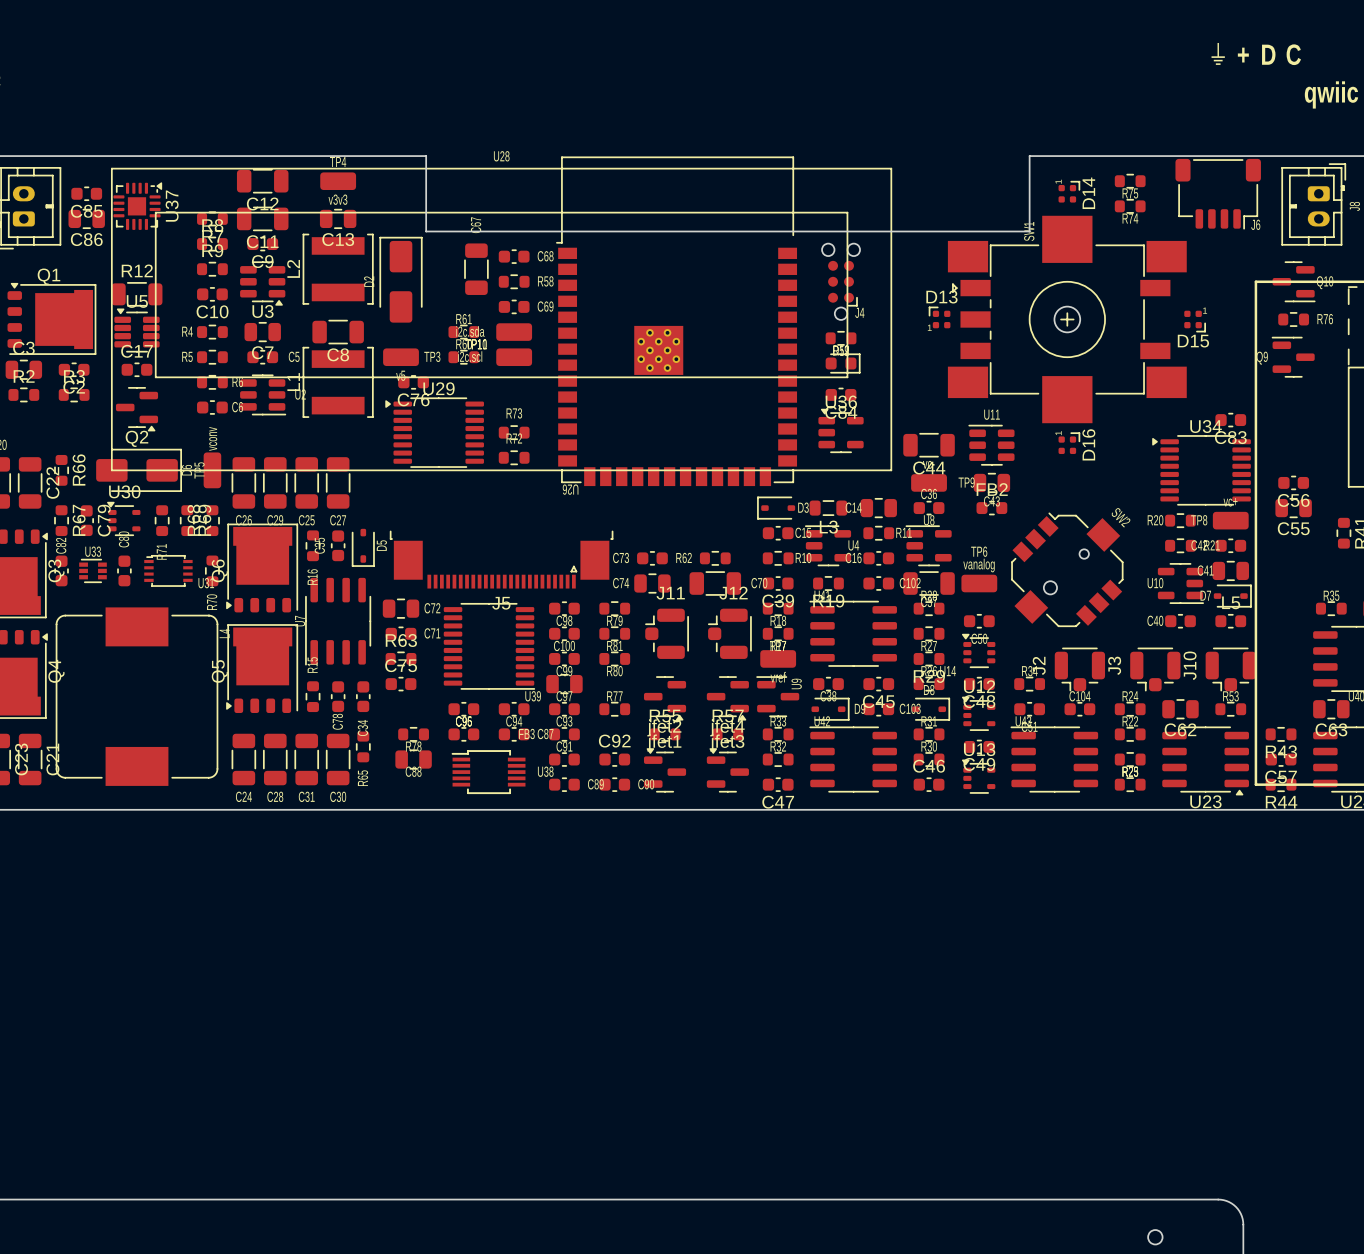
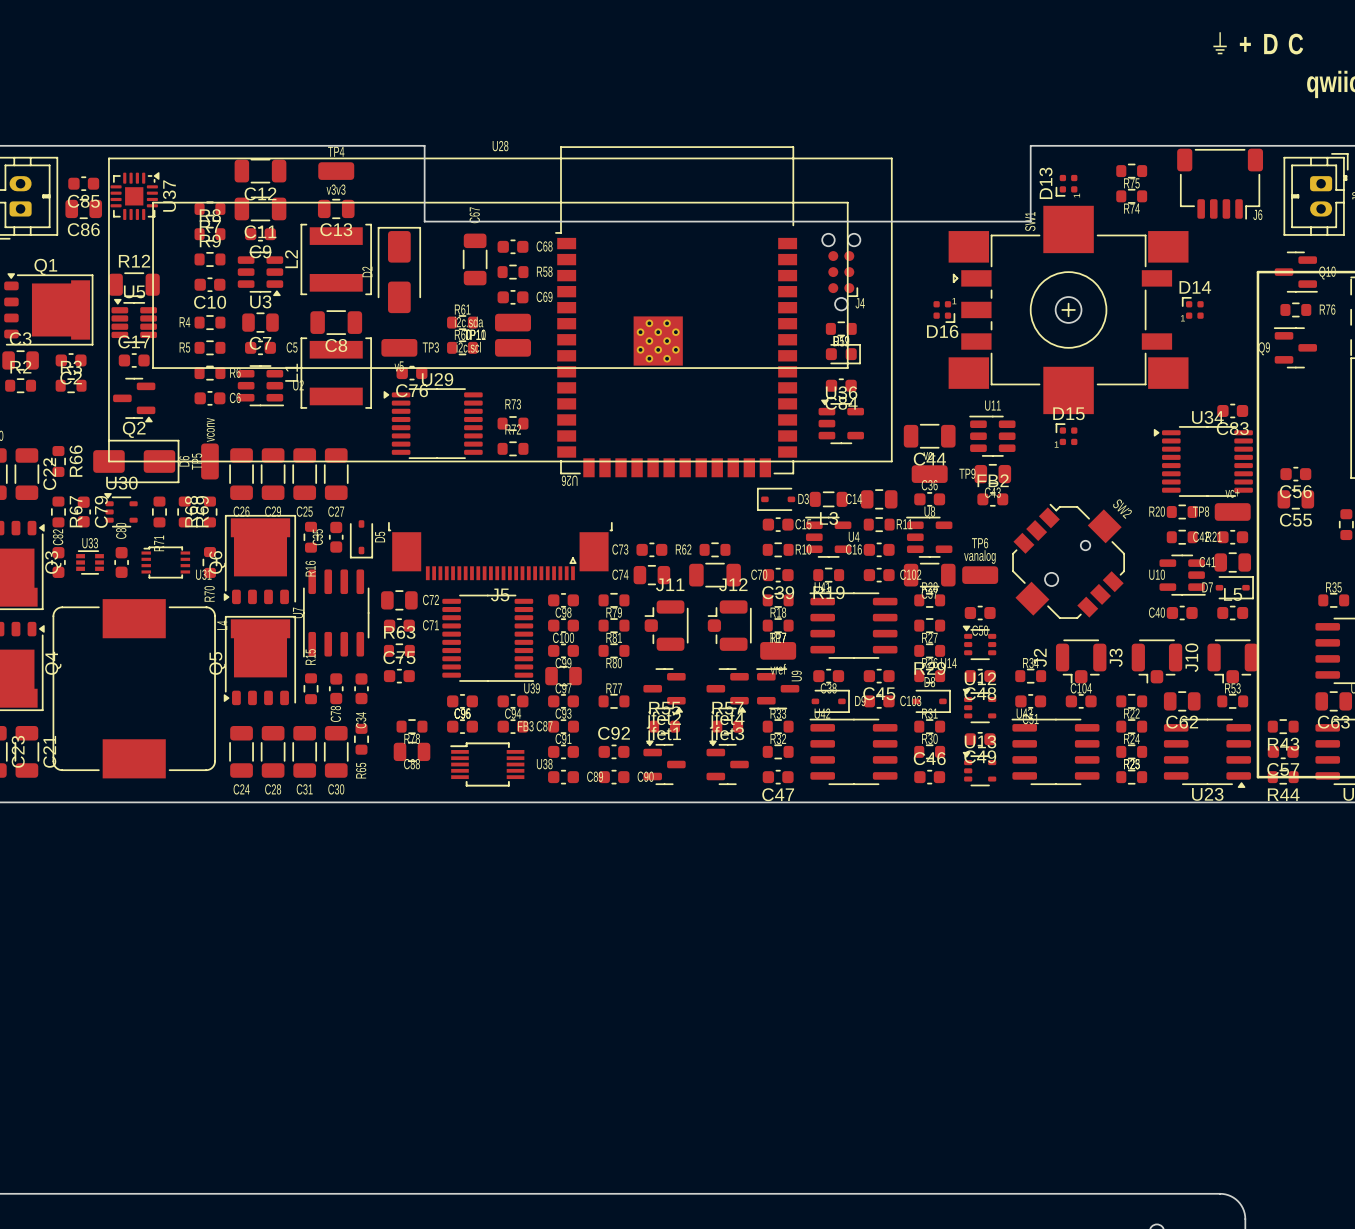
D14 rotation: 0° (1069, 191) -> 90° counterclockwise (1192, 307)
D14 position: (1069, 191) -> (1192, 307)
D13 rotation: 0° (939, 317) -> 90° counterclockwise (1066, 185)
D13 position: (939, 317) -> (1066, 185)
D15 rotation: 0° (1195, 321) -> 180° (1066, 434)
D15 position: (1195, 321) -> (1066, 434)
D16 rotation: 0° (1069, 443) -> 90° clockwise (944, 311)
D16 position: (1069, 443) -> (944, 311)
R24 name: R24 (1130, 696) -> R22 (1131, 713)
R22 name: R22 (1130, 721) -> R24 (1131, 738)

